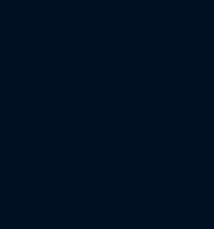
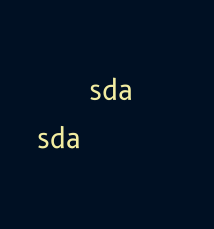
text: none -> sda (110, 88)
text: none -> sda (58, 137)

